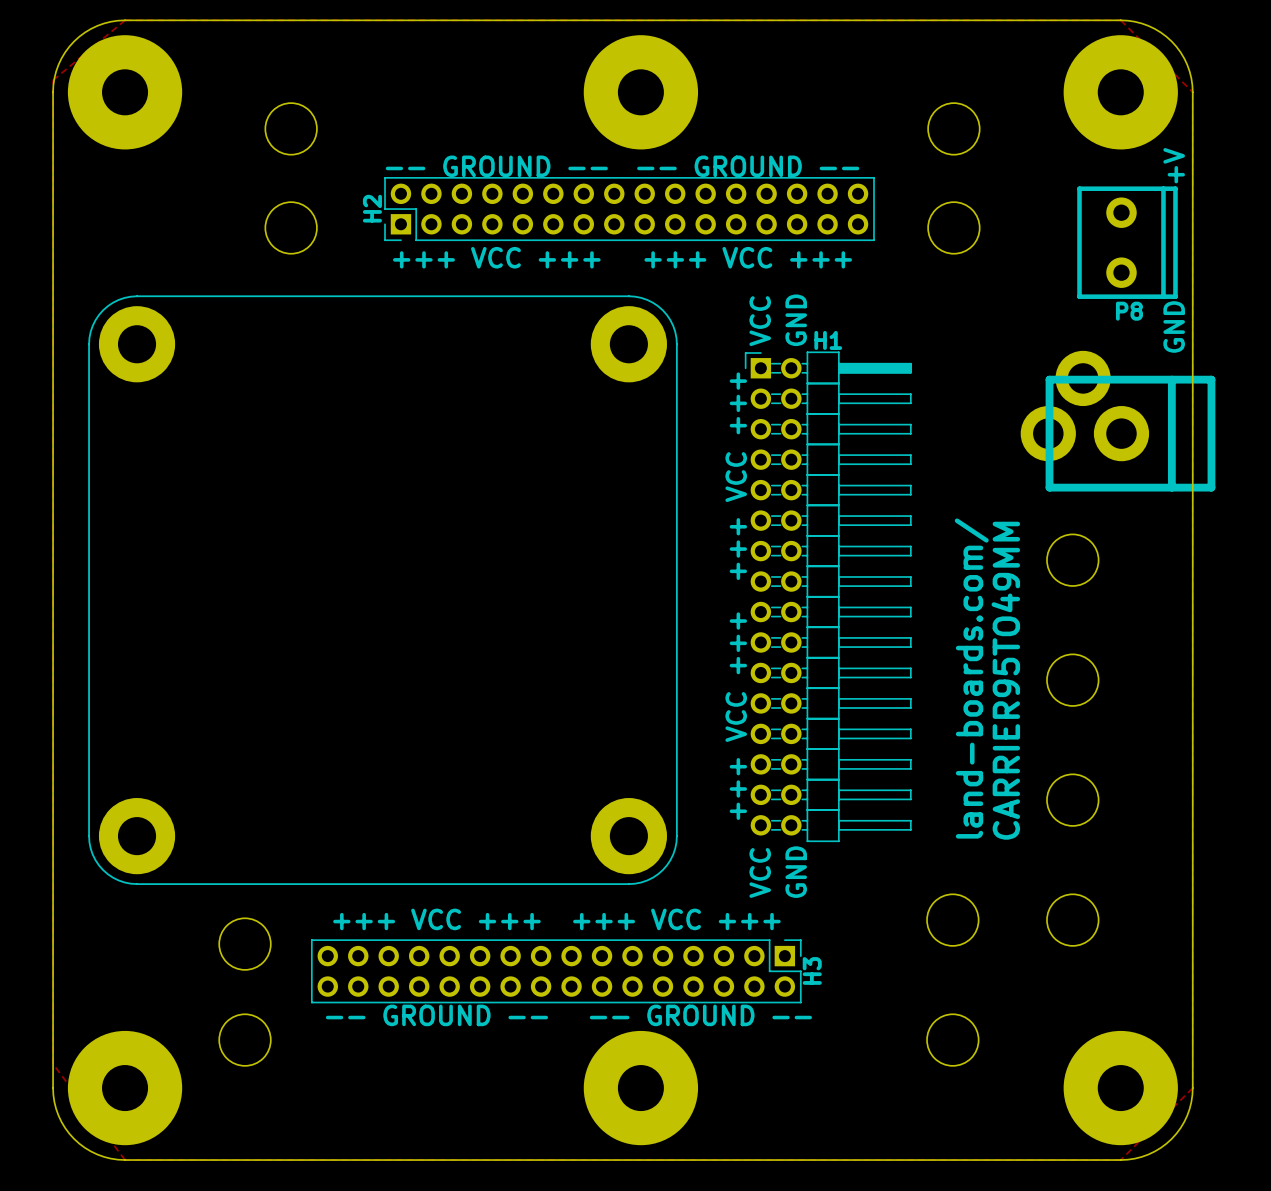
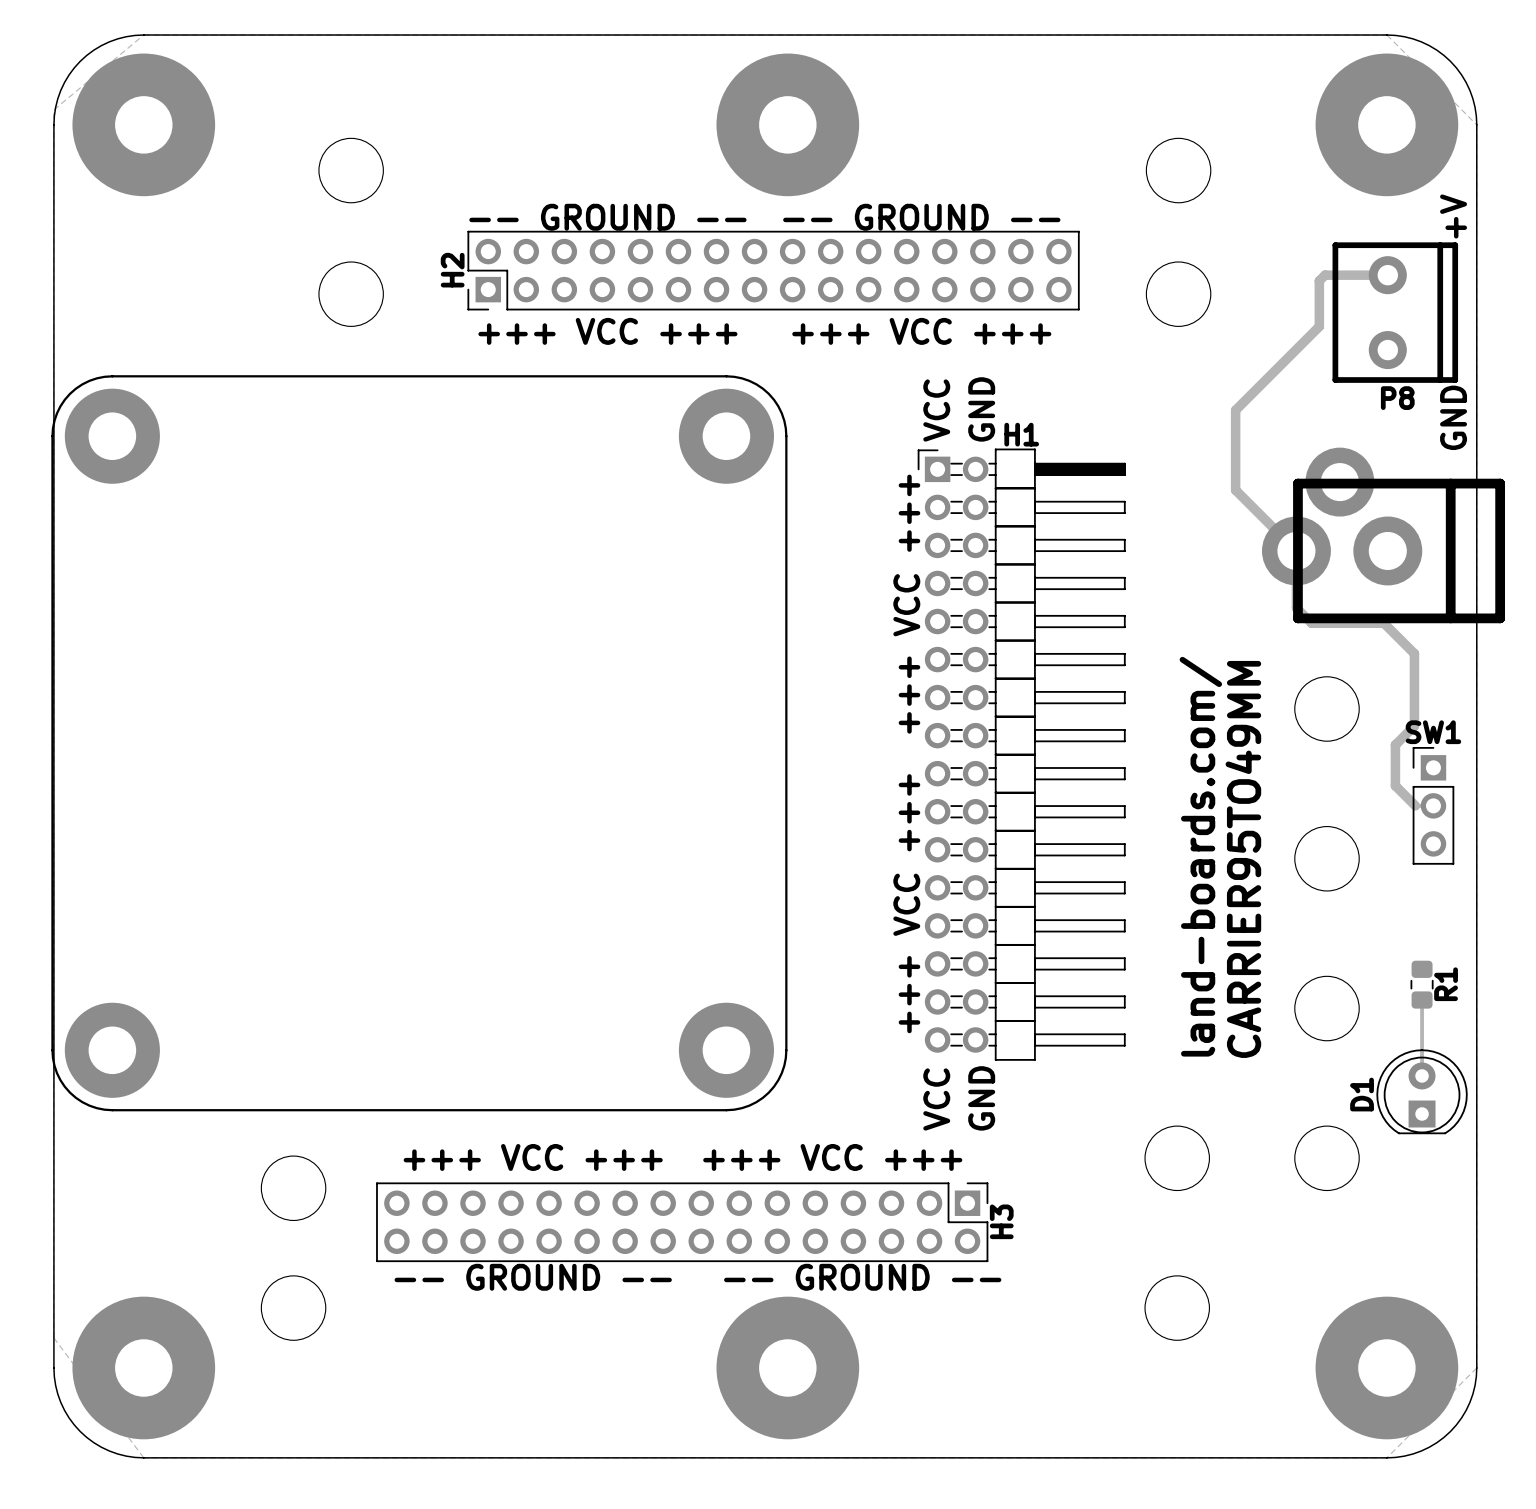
track: none -> (1387, 275) (1325, 275) (1319, 280) (1319, 326) (1235, 410) (1235, 490) (1296, 550) (1296, 607) (1311, 623) (1384, 623) (1414, 653) (1414, 725) (1395, 744) (1395, 785) (1415, 805) (1433, 805)
part position: (382, 590) -> (419, 743)
SW1: none -> (1433, 805)
R1: none -> (1422, 984)
track: none -> (1422, 1000) (1422, 1075)
D1: none -> (1422, 1091)

